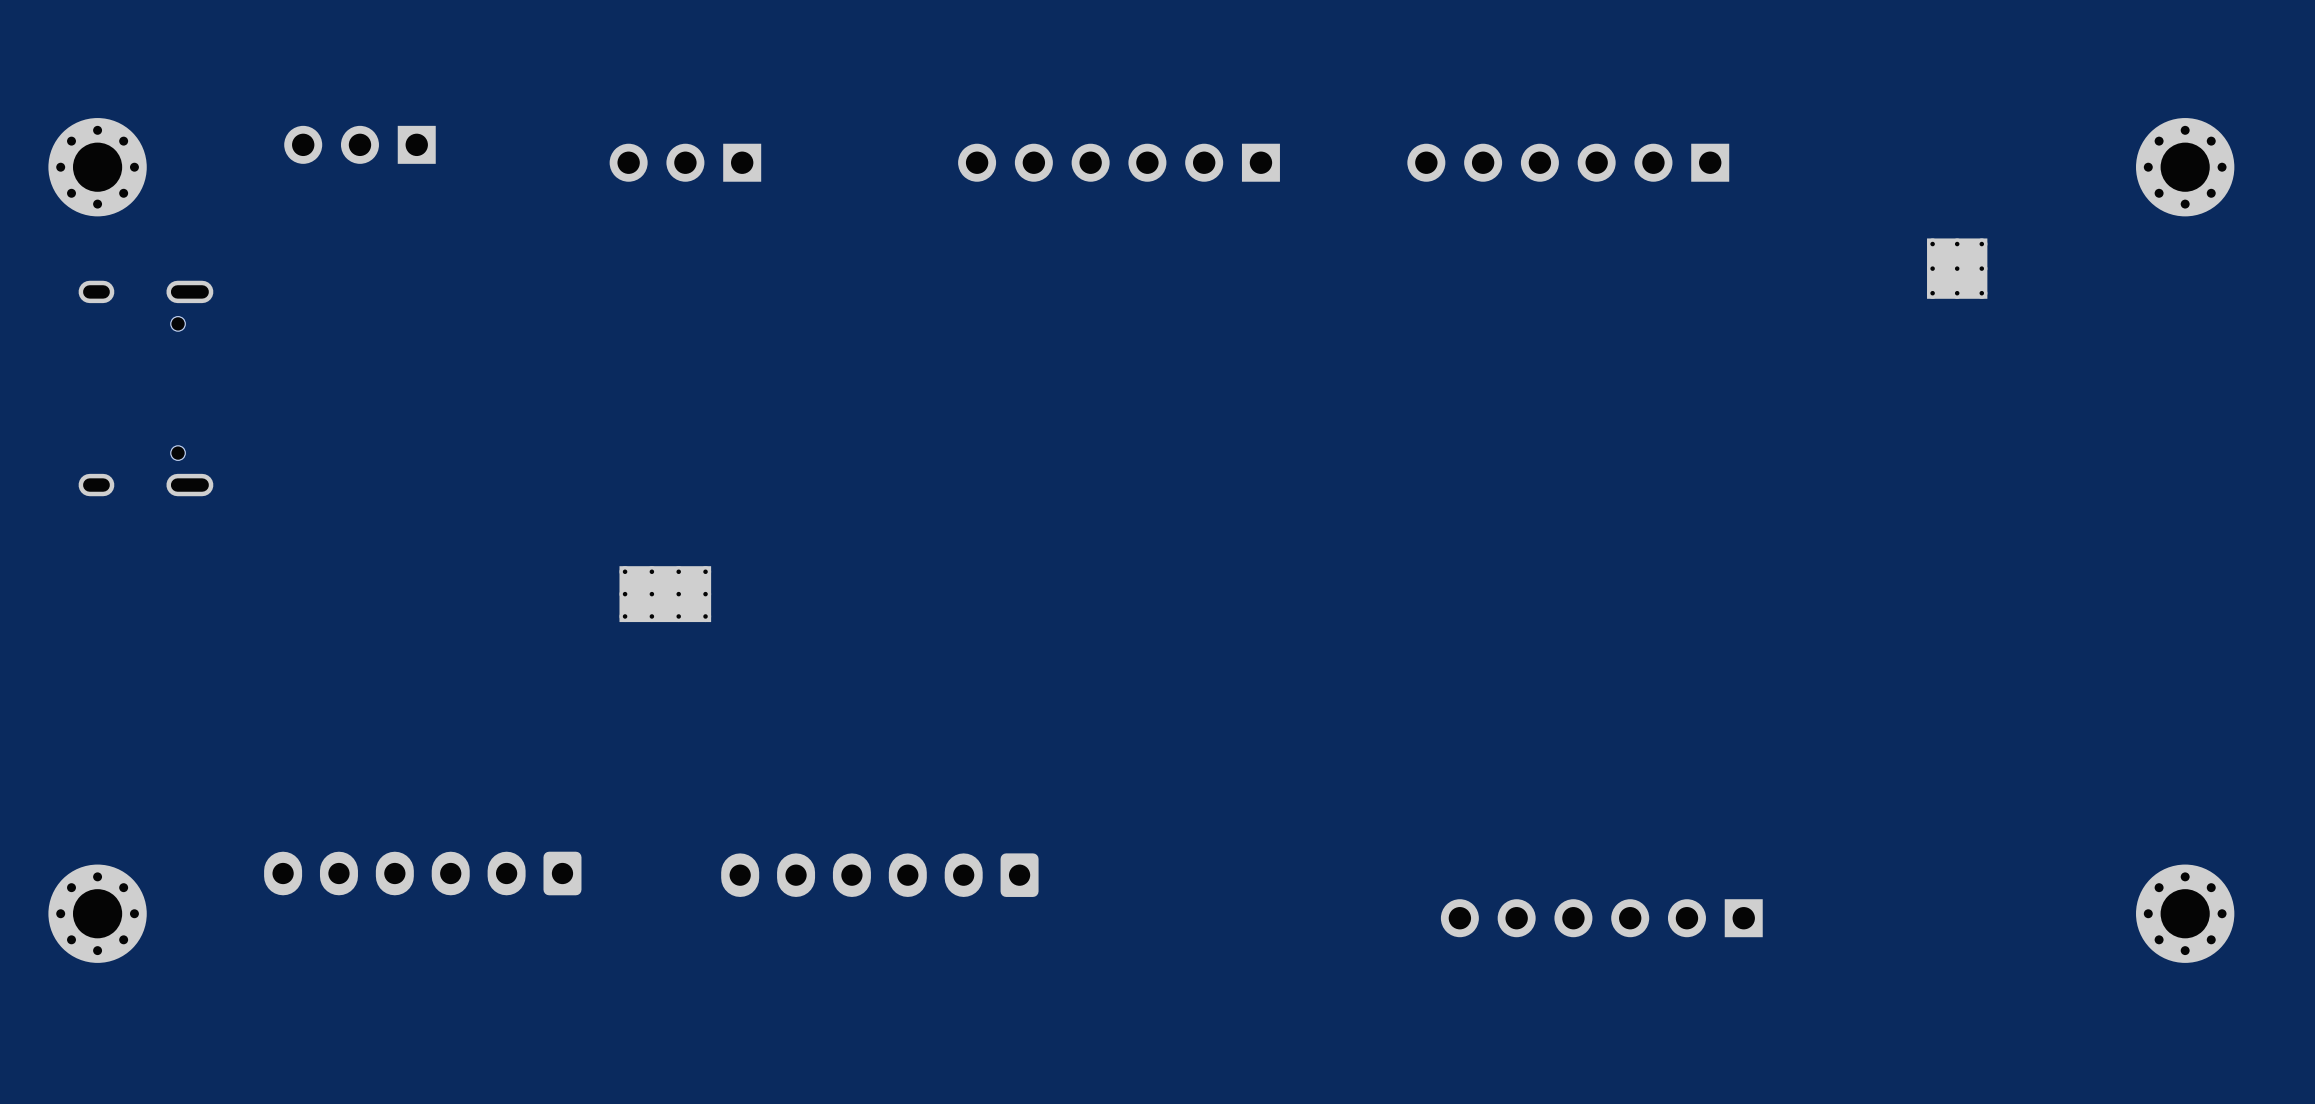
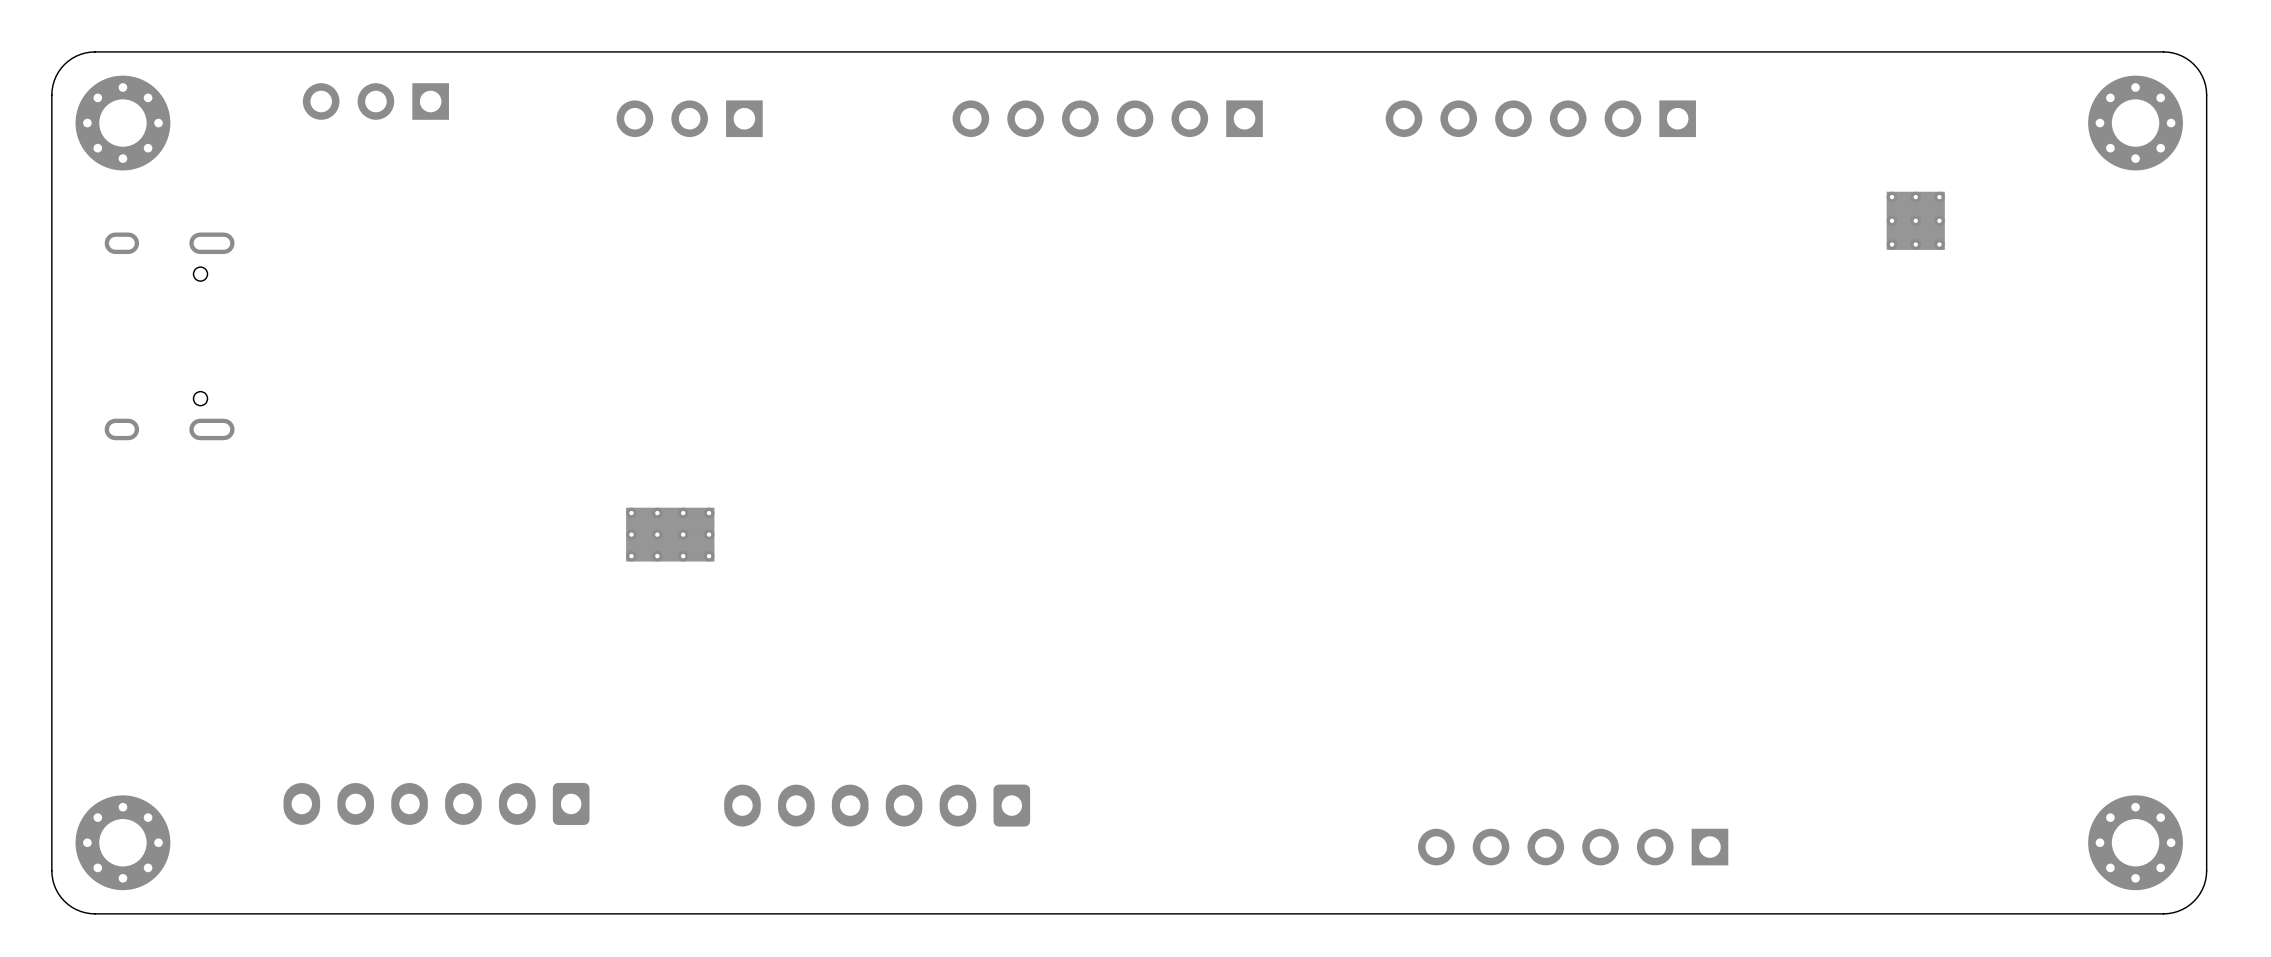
board edge: none -> (2163, 51) (94, 51) (80, 54) (68, 61) (61, 68) (54, 80) (51, 95) (51, 870) (54, 885) (58, 893) (68, 904) (80, 911) (94, 913) (2163, 913) (2177, 911) (2190, 904) (2200, 893) (2205, 880) (2206, 870) (2206, 95) (2204, 80) (2194, 64) (2177, 54) (2163, 51)

